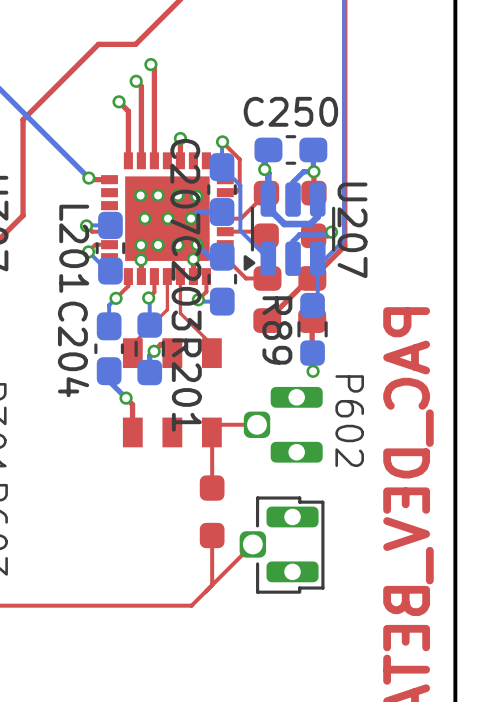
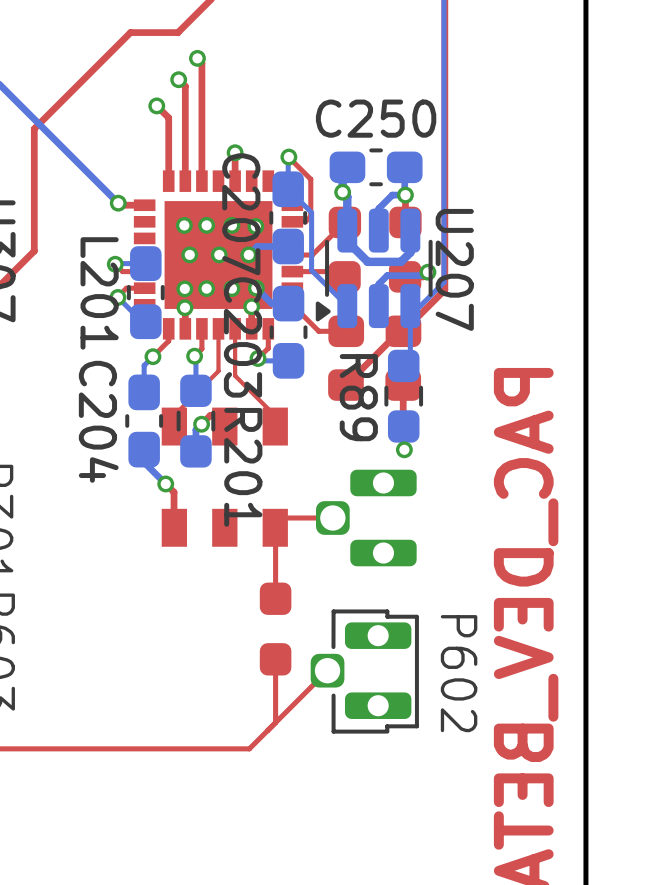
P602 name position: P602 (349, 421) -> P602 (459, 673)

